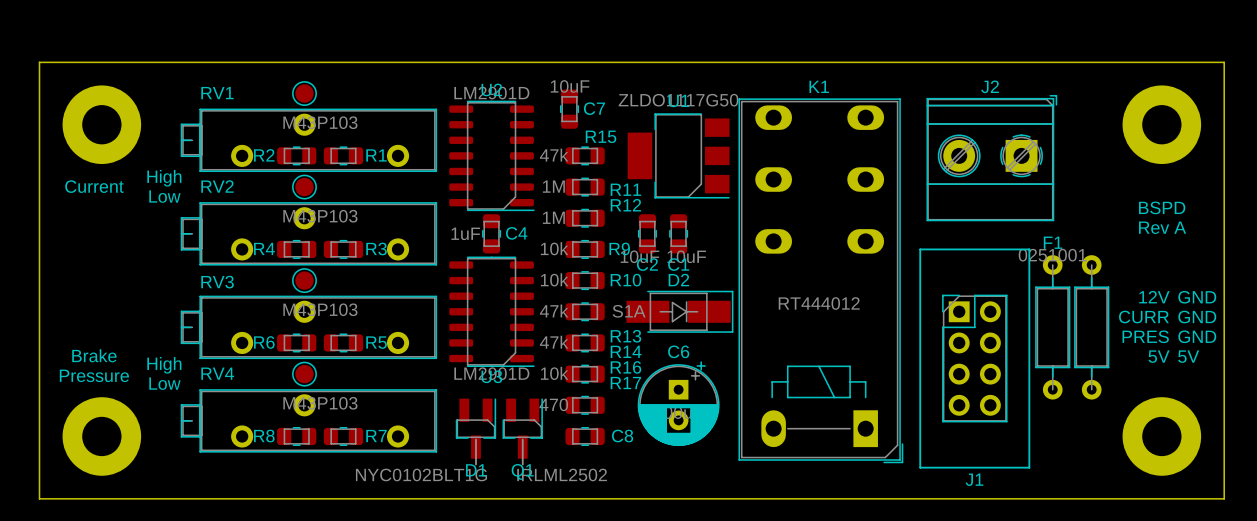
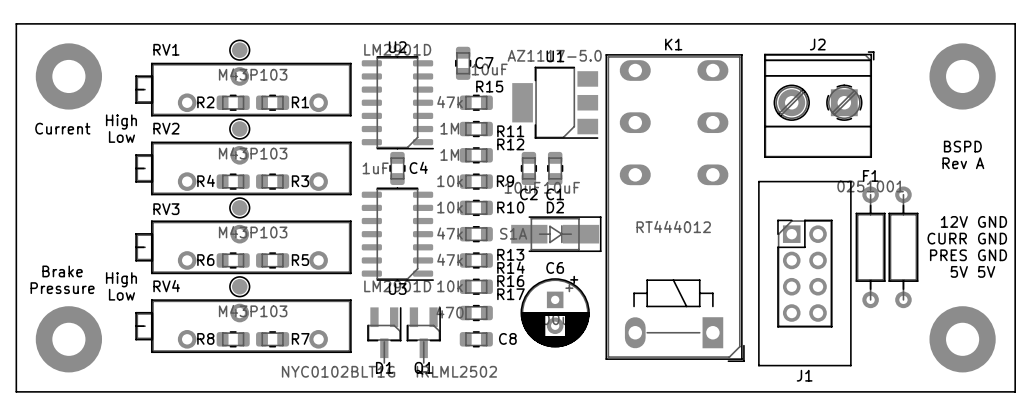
C7 value position: 10uF (570, 86) -> 10uF (489, 69)
U1 value: ZLDO1117G50 (678, 100) -> AZ1117-5.0 (554, 55)

